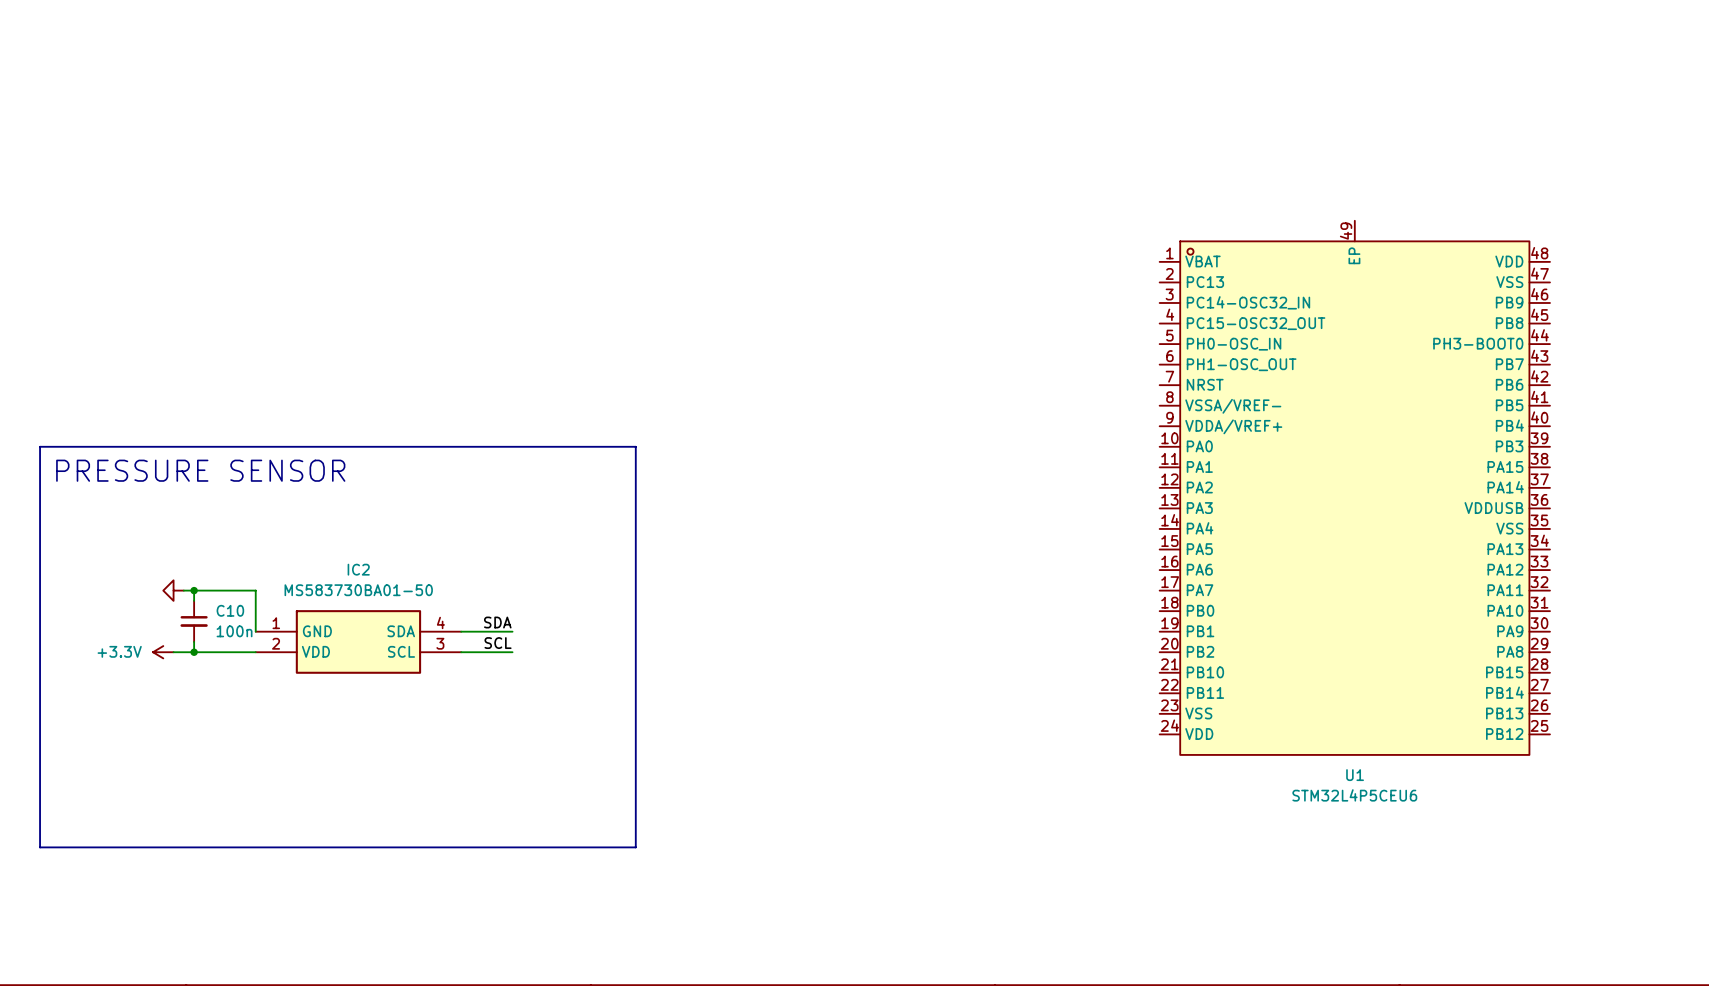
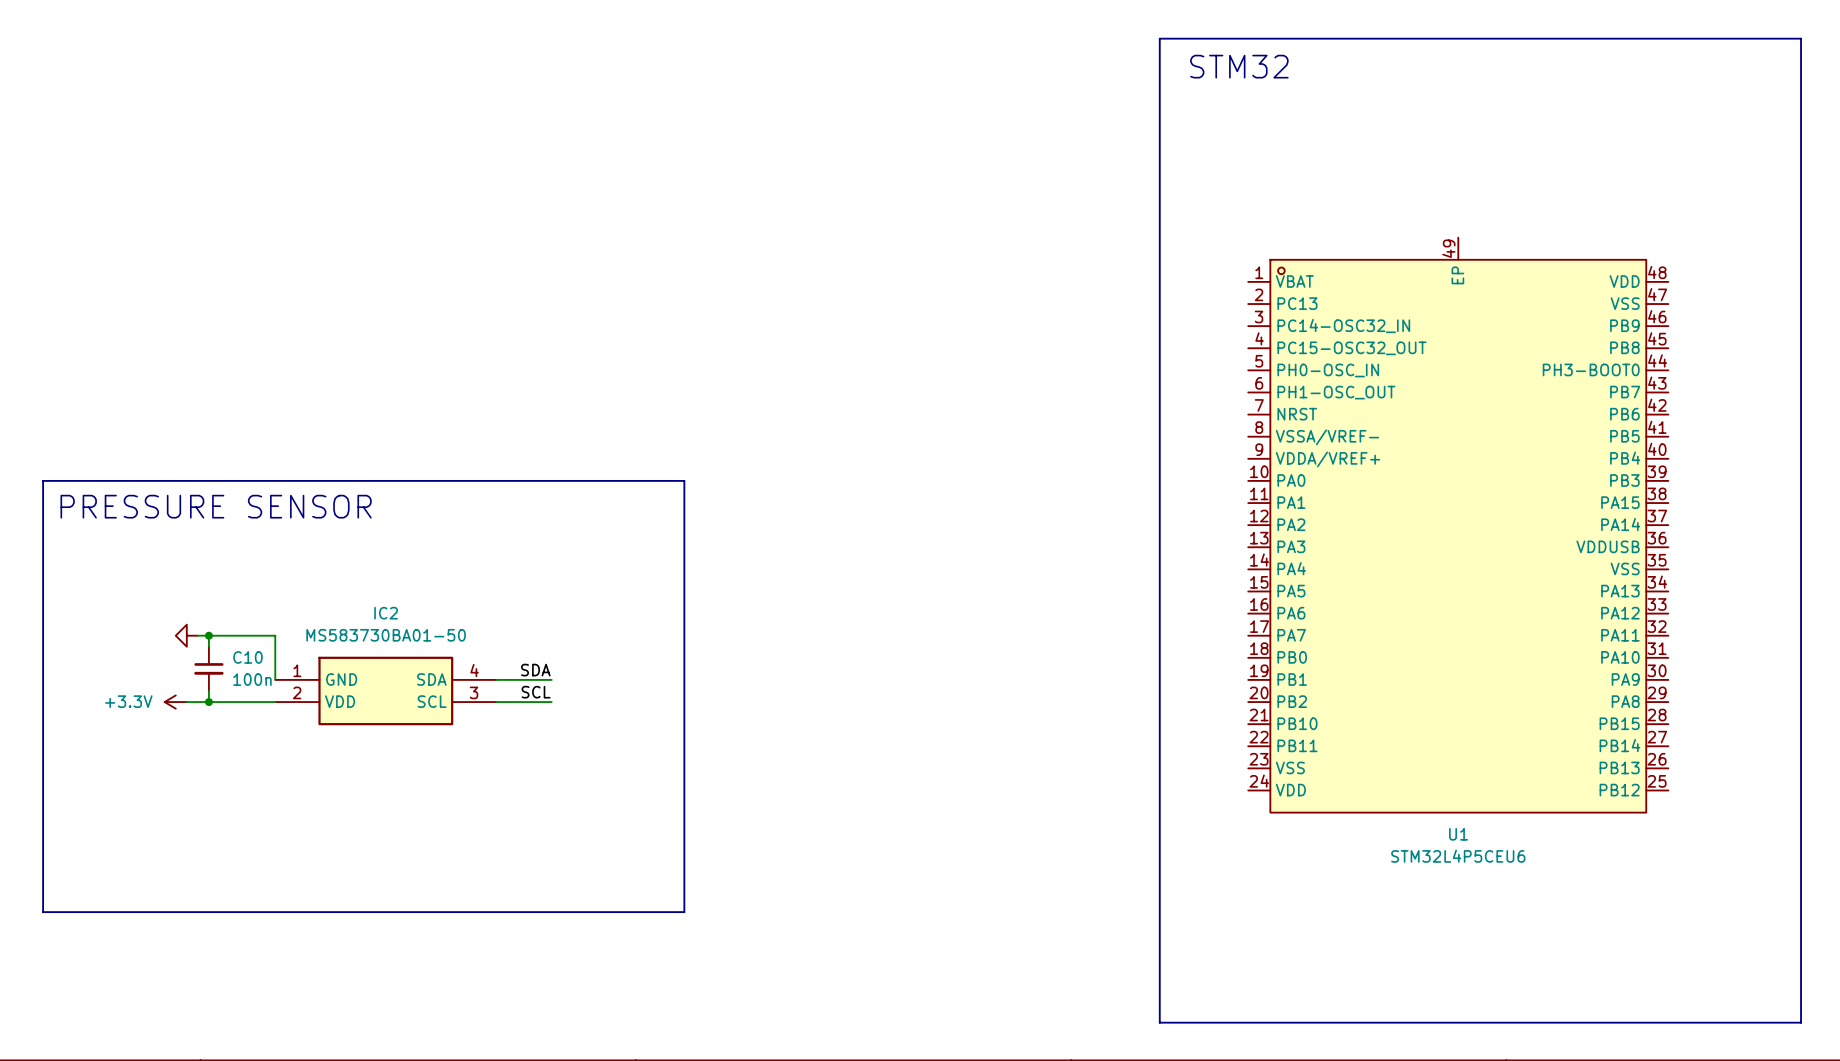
line: none -> (1159, 38) (1801, 38) (1801, 1022) (1159, 1022) (1159, 38)
text: none -> STM32 (1239, 66)

